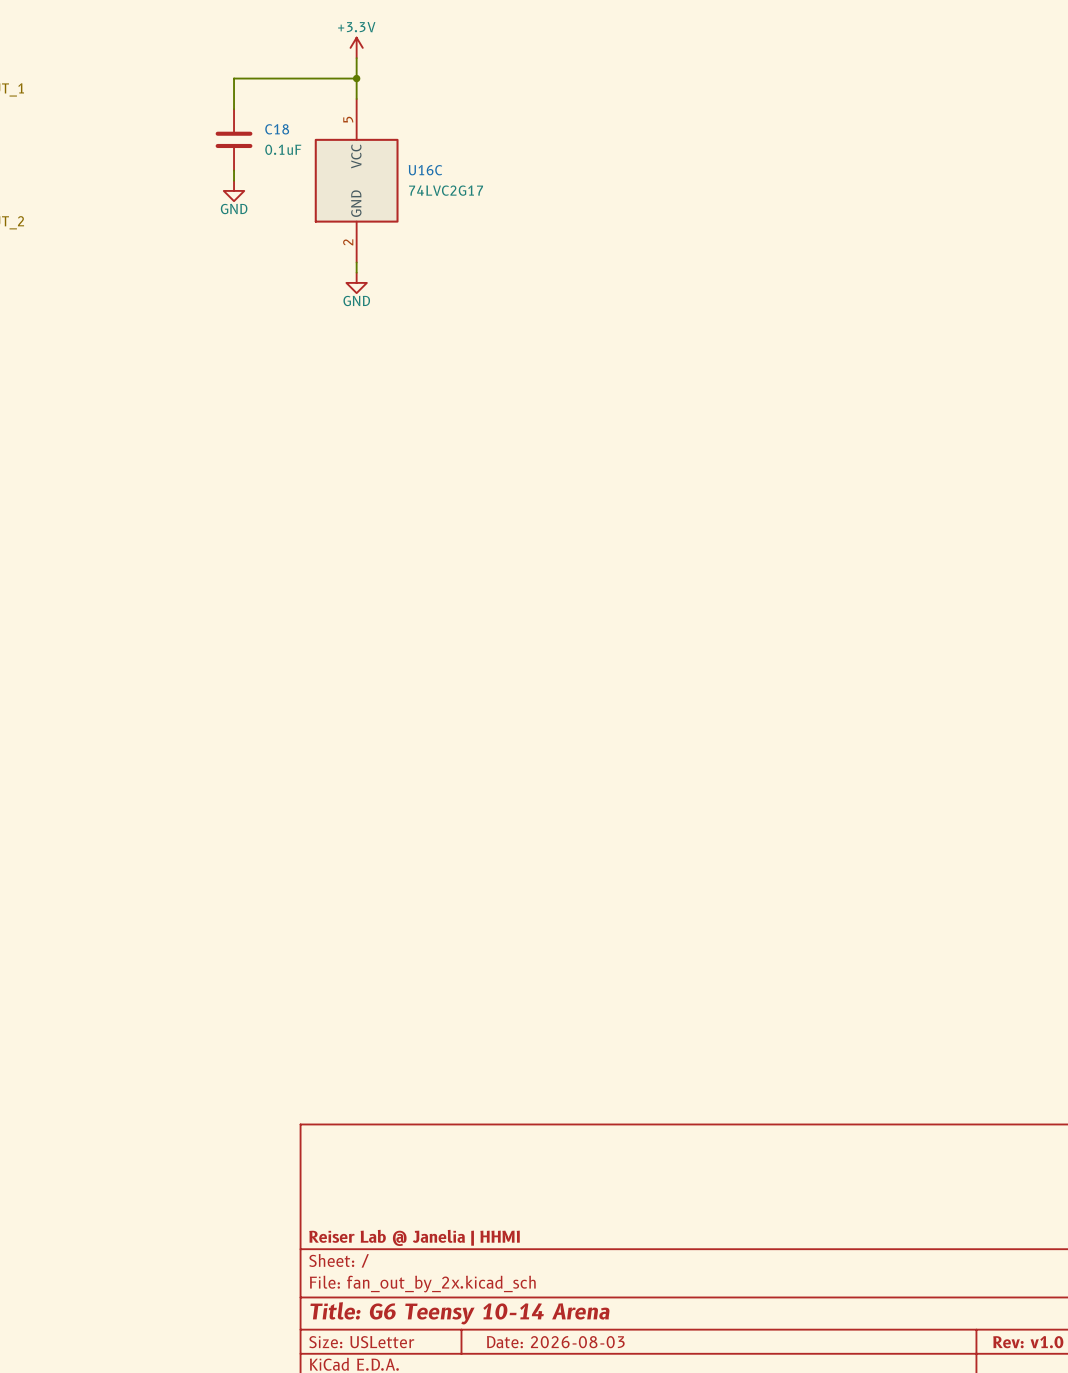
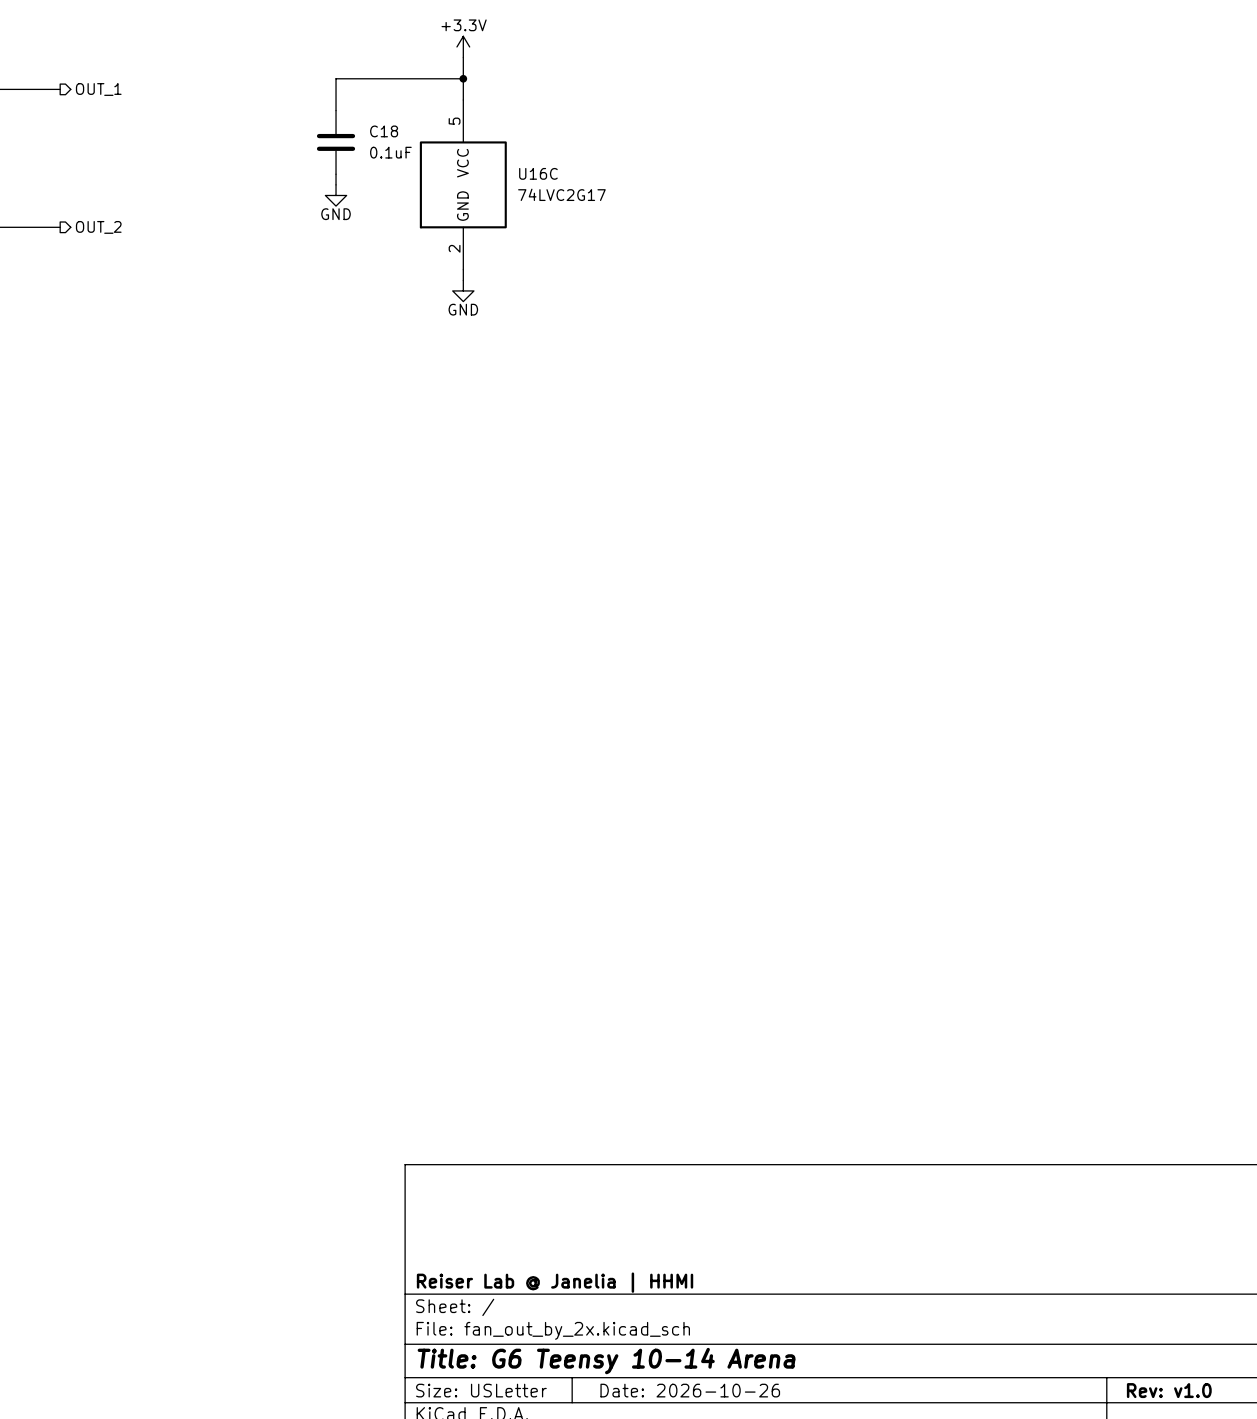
title block: Date: 2026-08-03 (555, 1342) -> Date: 2026-10-26 (690, 1390)

